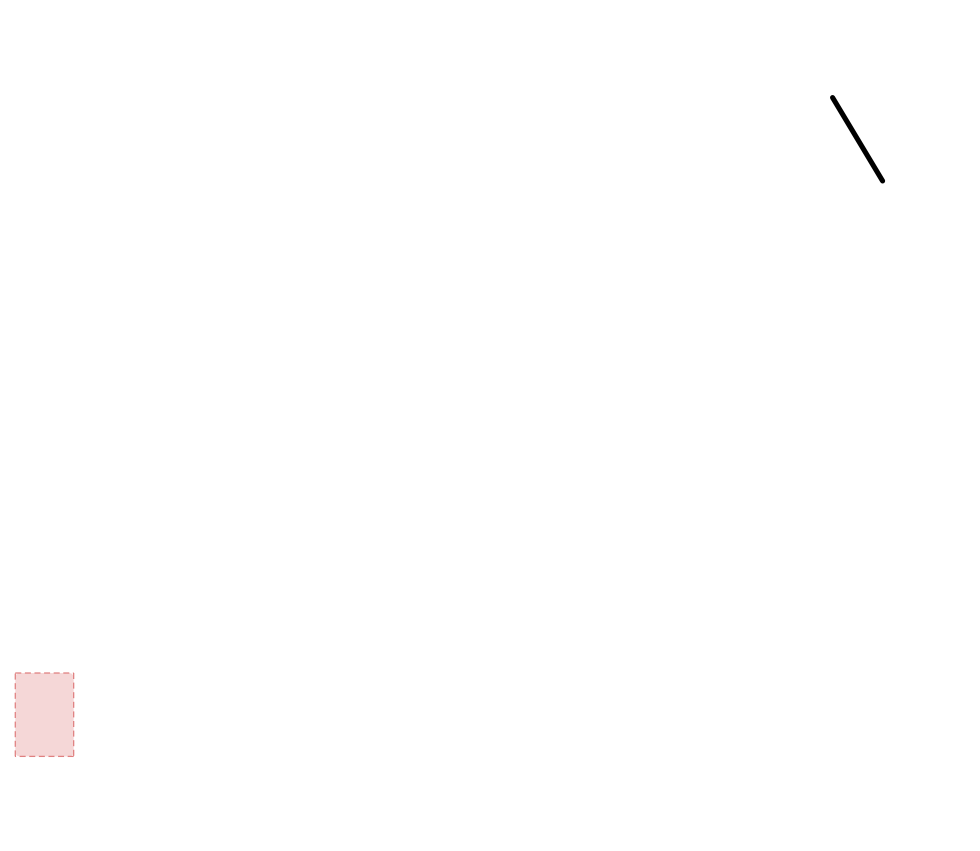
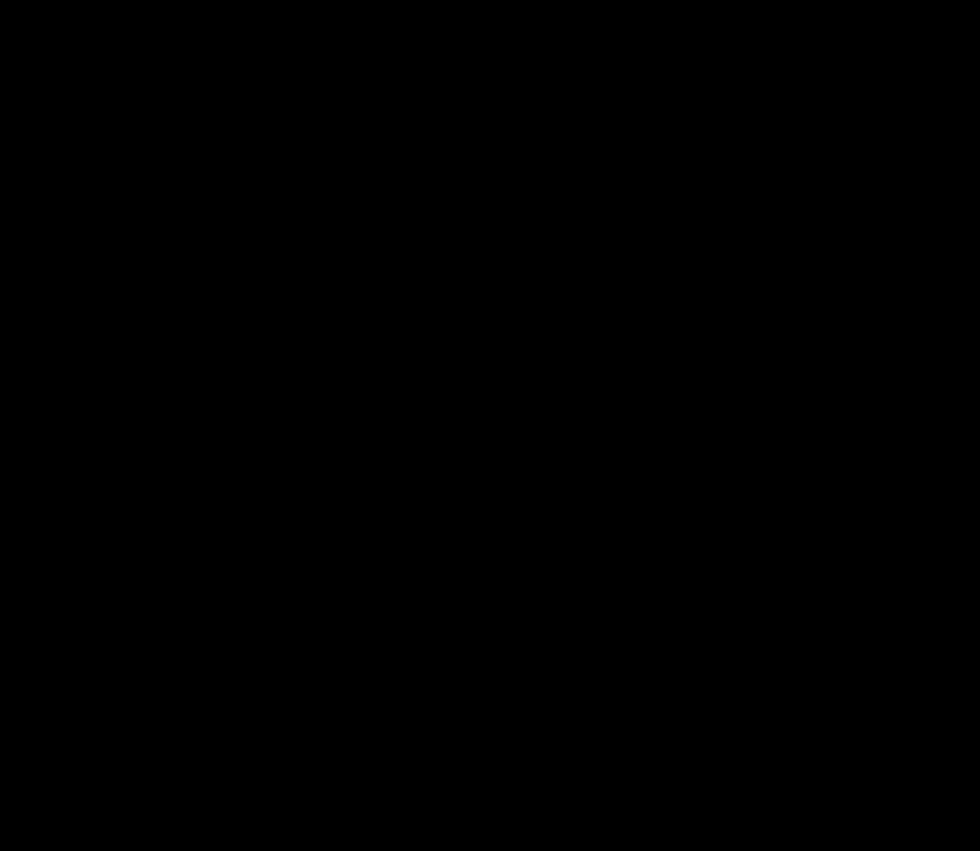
line: (832, 97) (882, 180) -> none
zone outline: (15, 673) (73, 673) (73, 756) (15, 756) (15, 673) -> none

